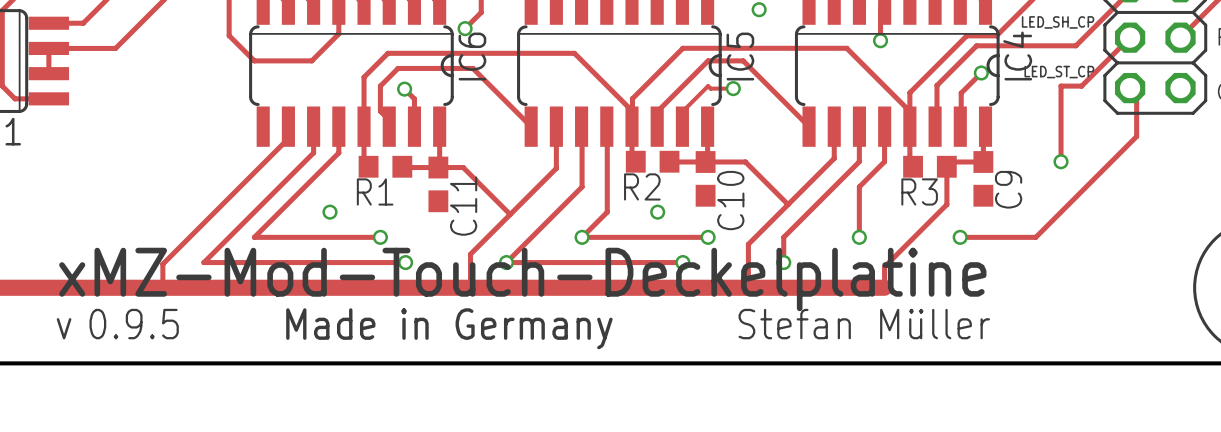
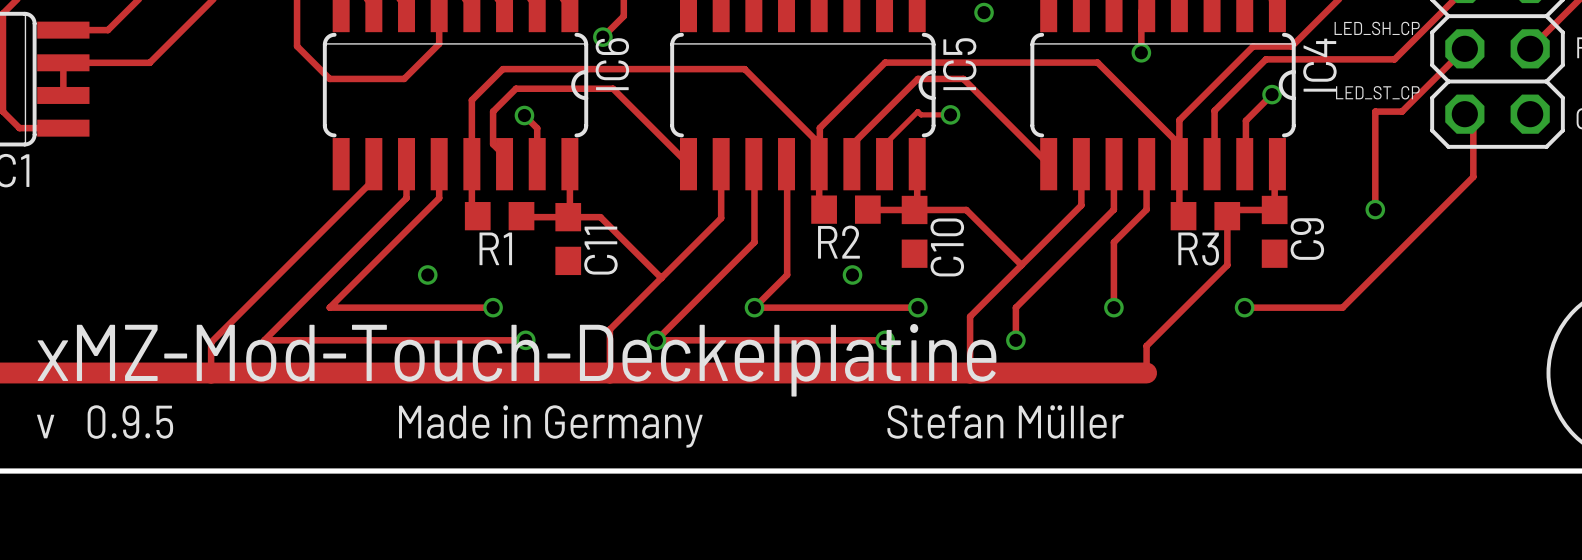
drawing: none -> [36, 323, 1124, 448]
drawing: [56, 247, 991, 350] -> none

